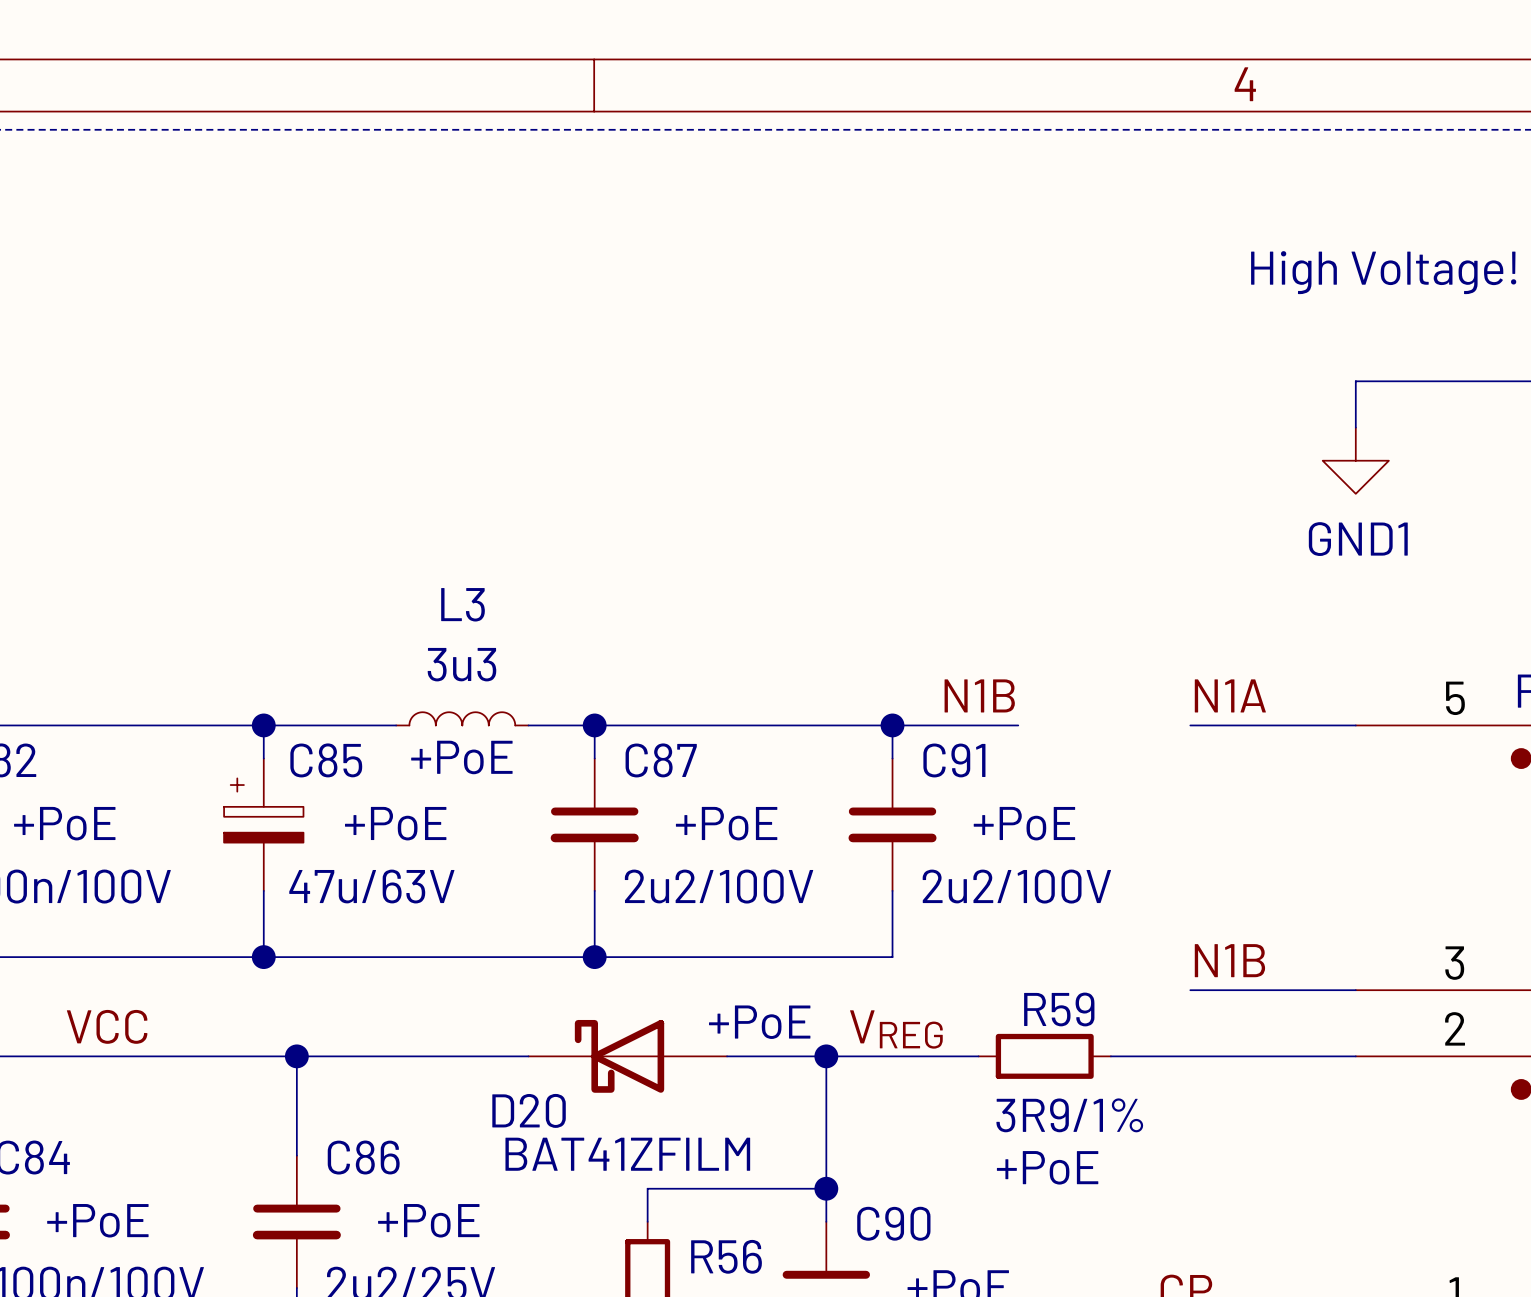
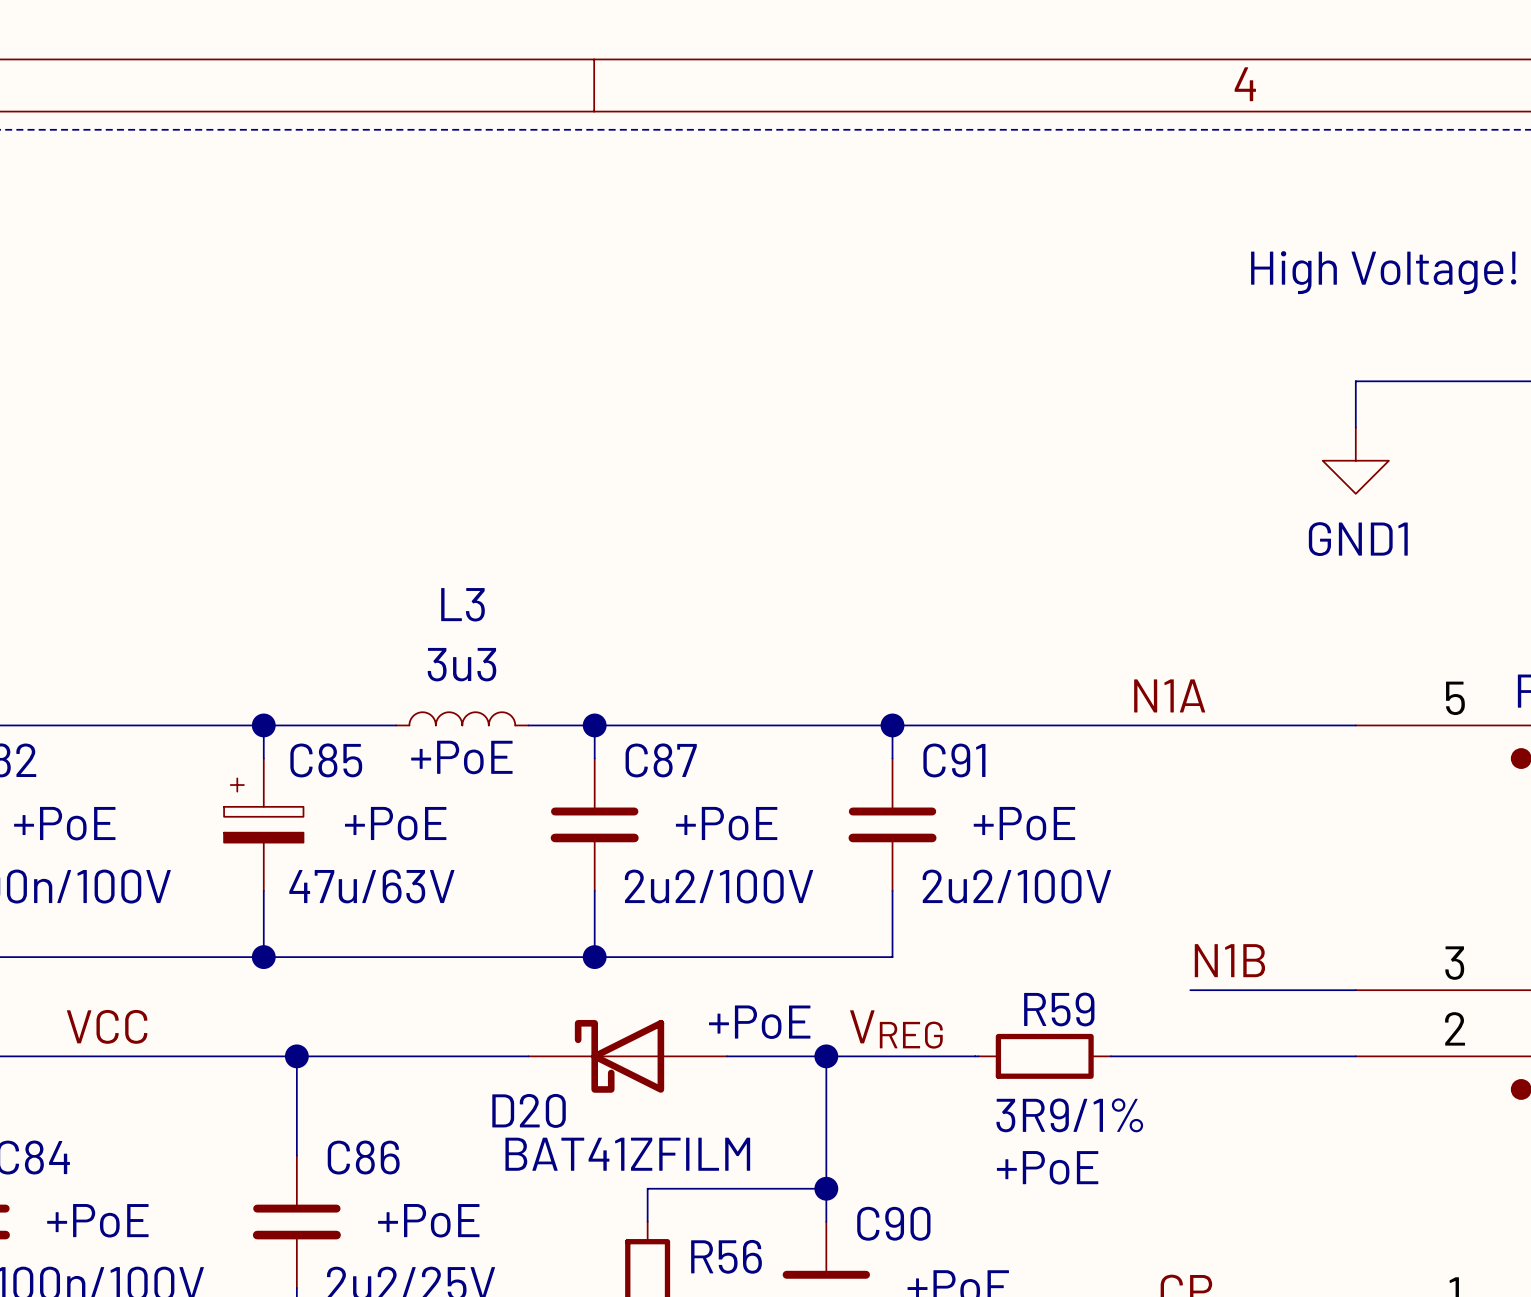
label: N1B (979, 695) -> none
label position: N1A (1230, 695) -> N1A (1169, 695)
wire: none -> (1018, 725) (1190, 725)

